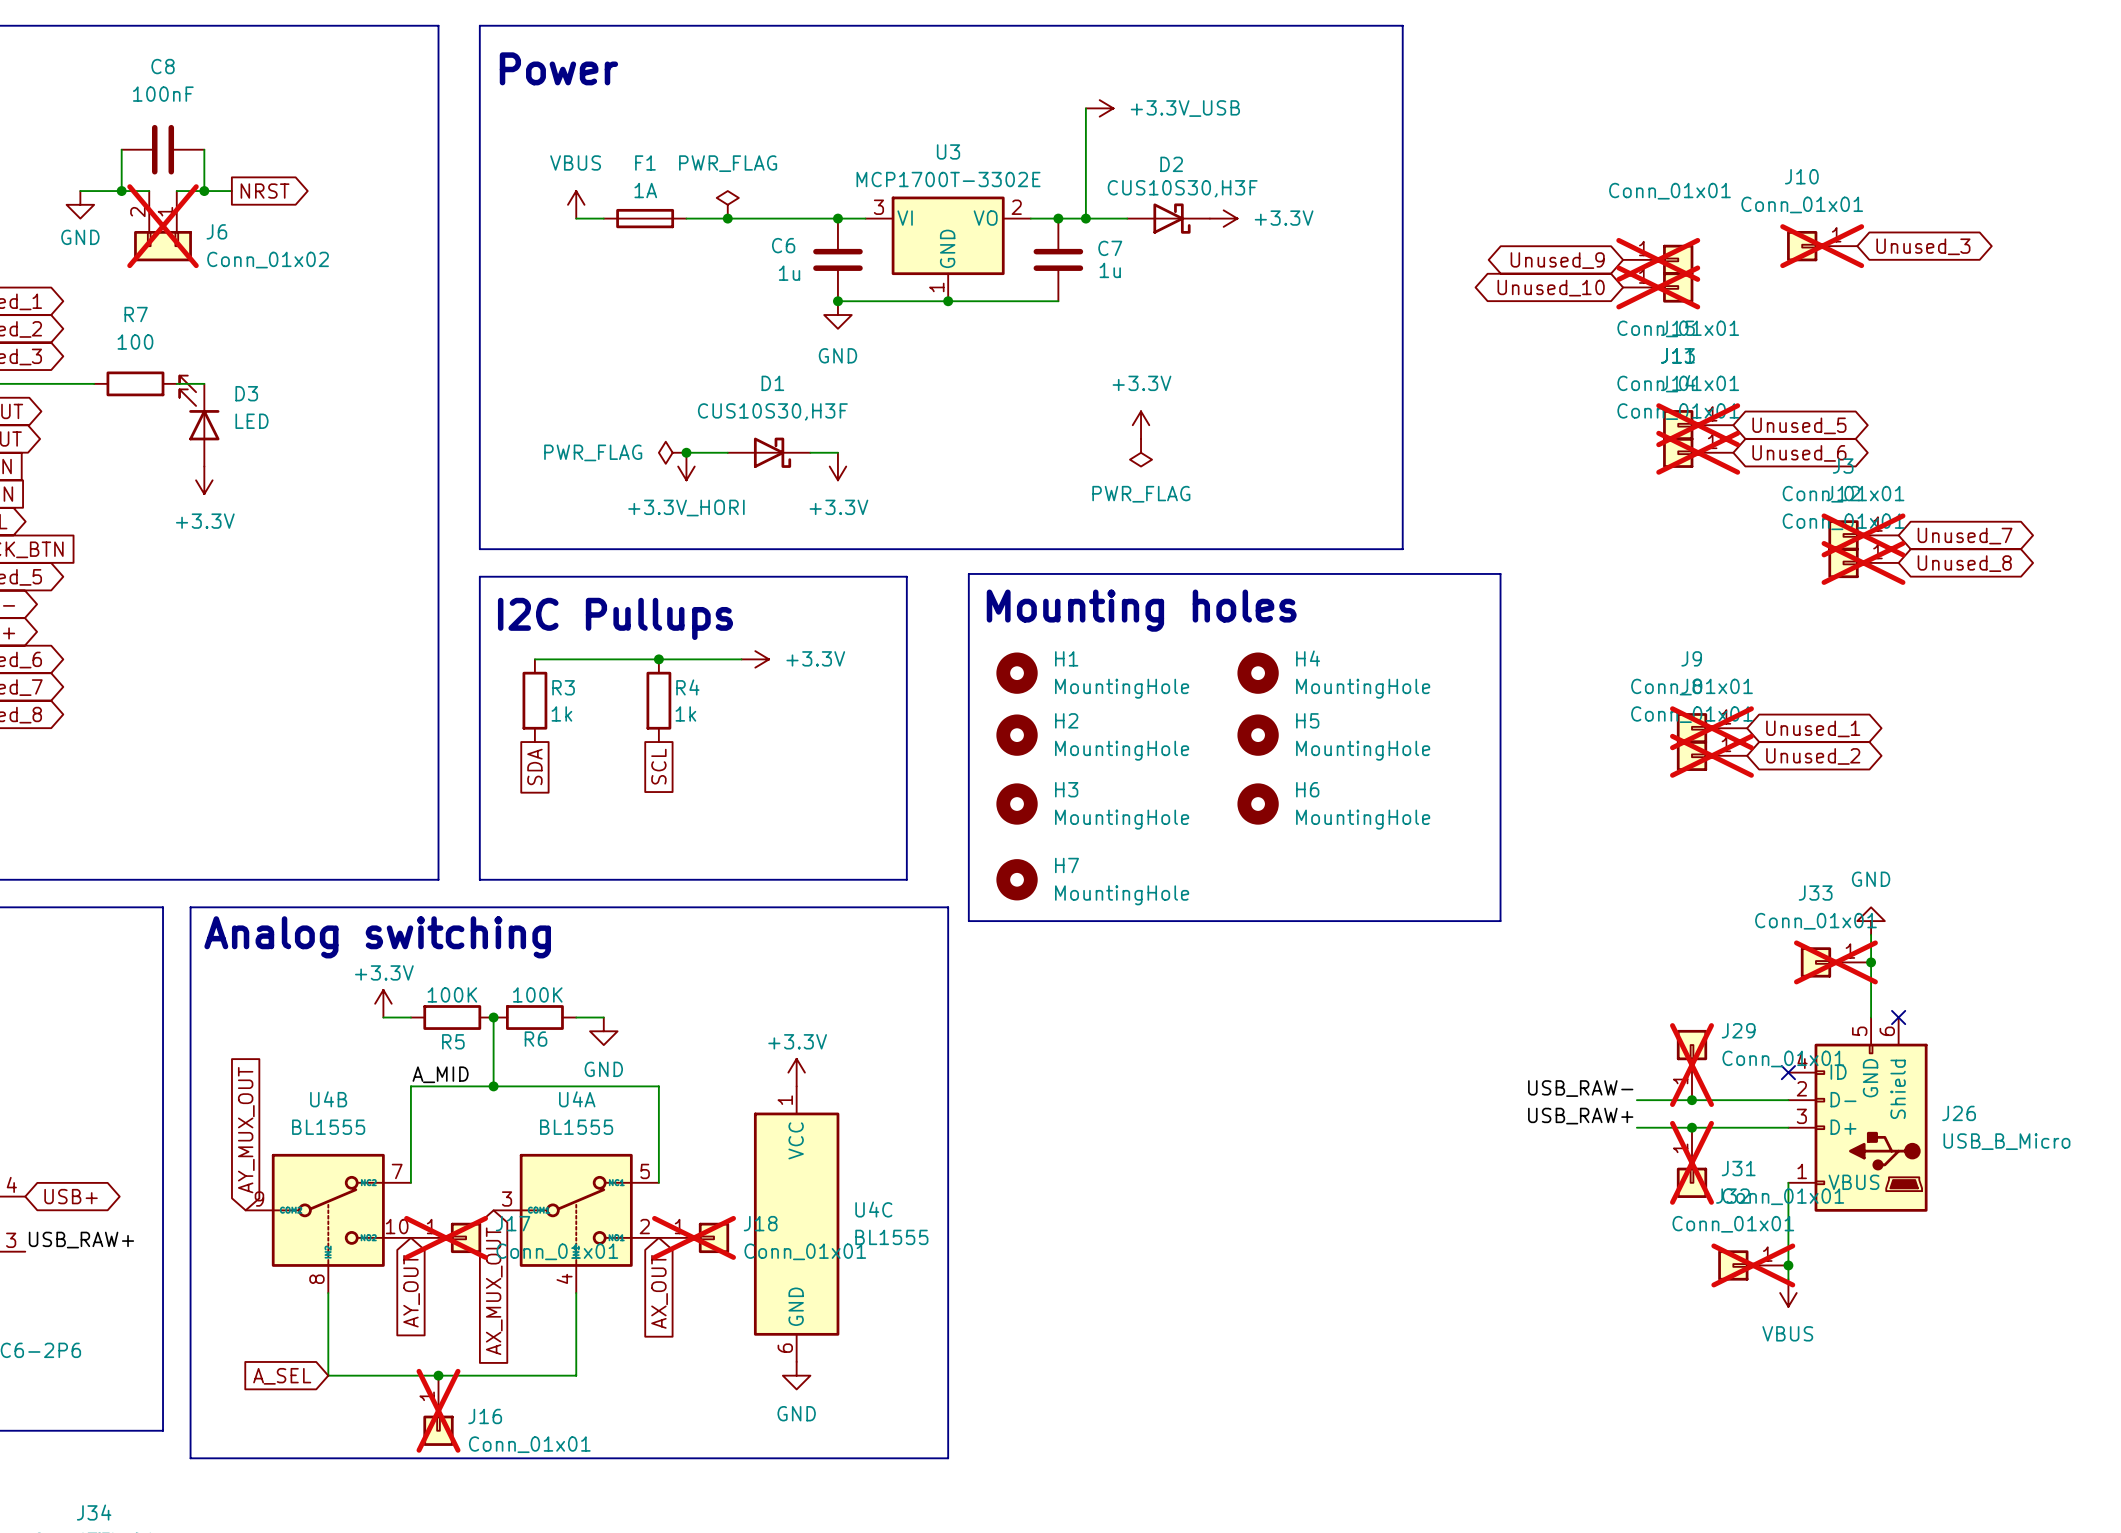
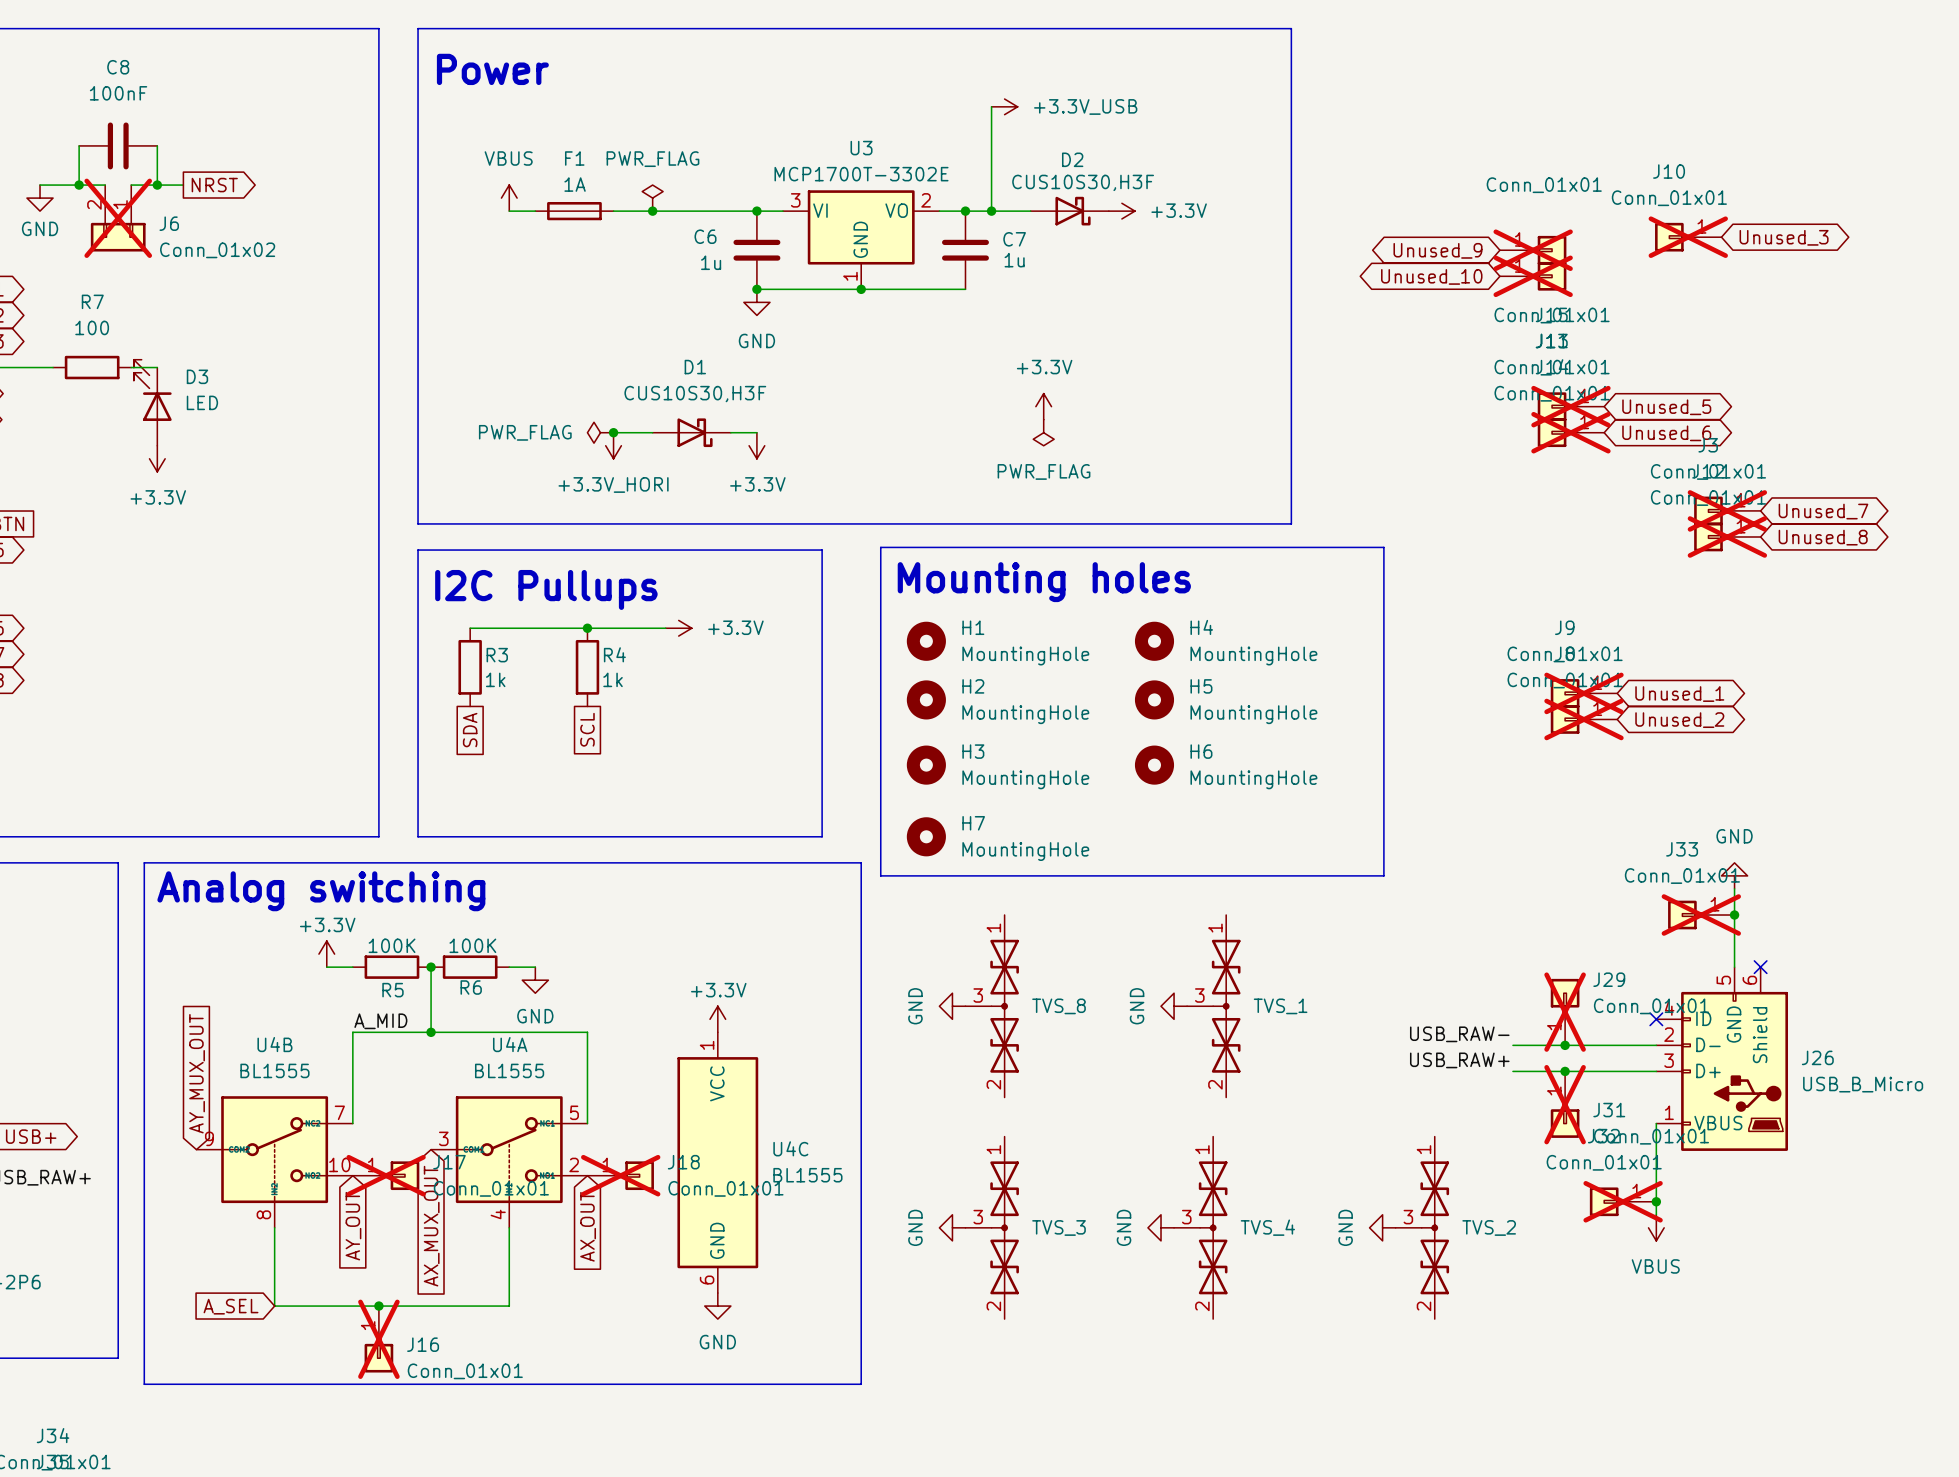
power symbol: none -> GND (952, 1006)
TVS_8: none -> (992, 1006)
power symbol: none -> GND (1174, 1006)
TVS_1: none -> (1213, 1006)
power symbol: none -> GND (952, 1227)
TVS_3: none -> (992, 1227)
power symbol: none -> GND (1161, 1227)
TVS_4: none -> (1200, 1227)
power symbol: none -> GND (1382, 1227)
TVS_2: none -> (1422, 1227)

